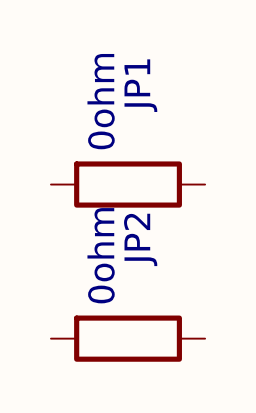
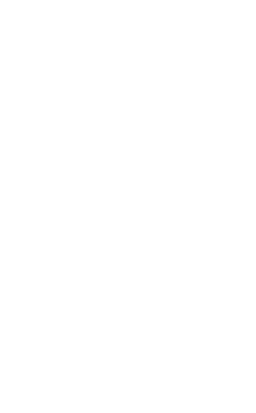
JP1: 0ohm (128, 184) -> none
JP2: 0ohm (128, 338) -> none

